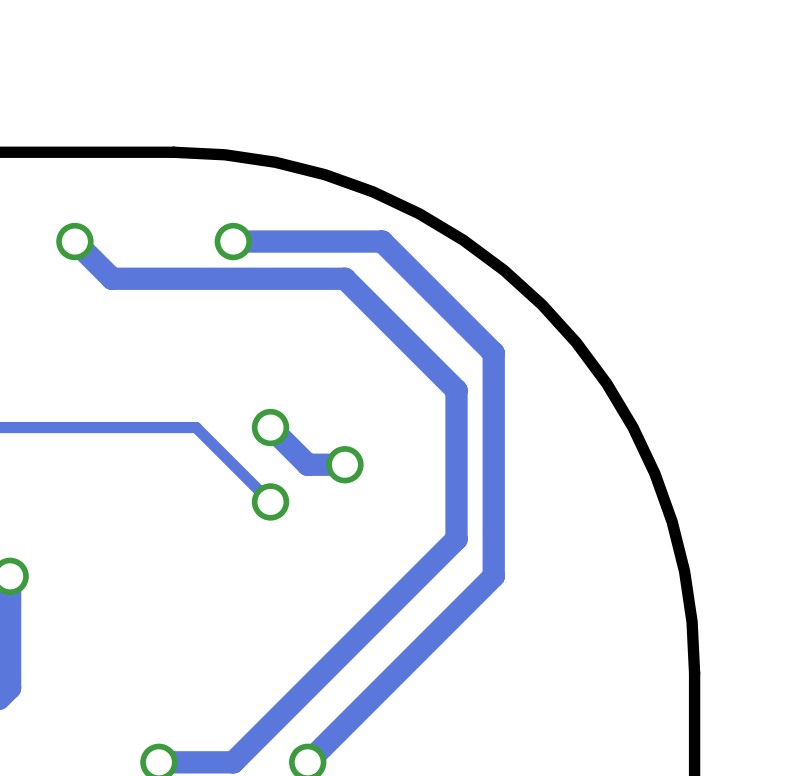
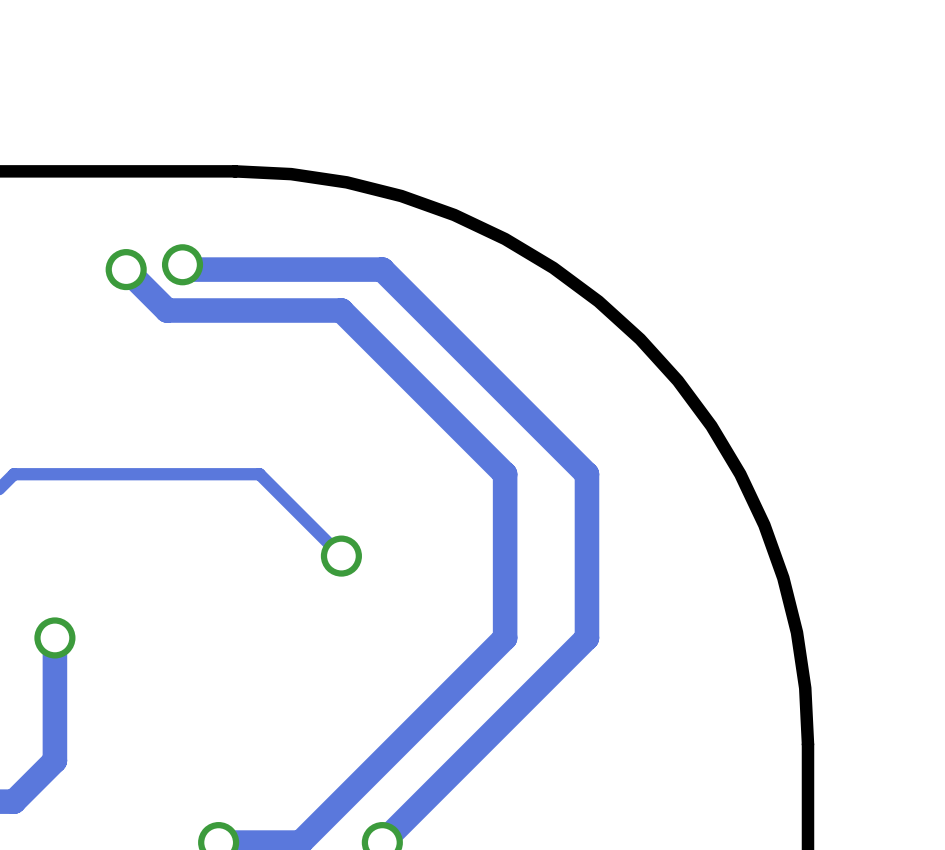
track: none -> (182, 264) (187, 269) (300, 269)
via position: (233, 241) -> (182, 264)
track: (307, 241) (382, 241) (493, 353) (493, 427) -> none
track: none -> (341, 310) (505, 474) (505, 637)
track: (344, 278) (270, 278) -> (423, 310) (382, 269)
track: (456, 390) (456, 539) (419, 576) -> (546, 433) (586, 474)
track: (270, 427) (307, 464) (344, 464) -> none
via: (270, 427) -> none
via: (344, 464) -> none

